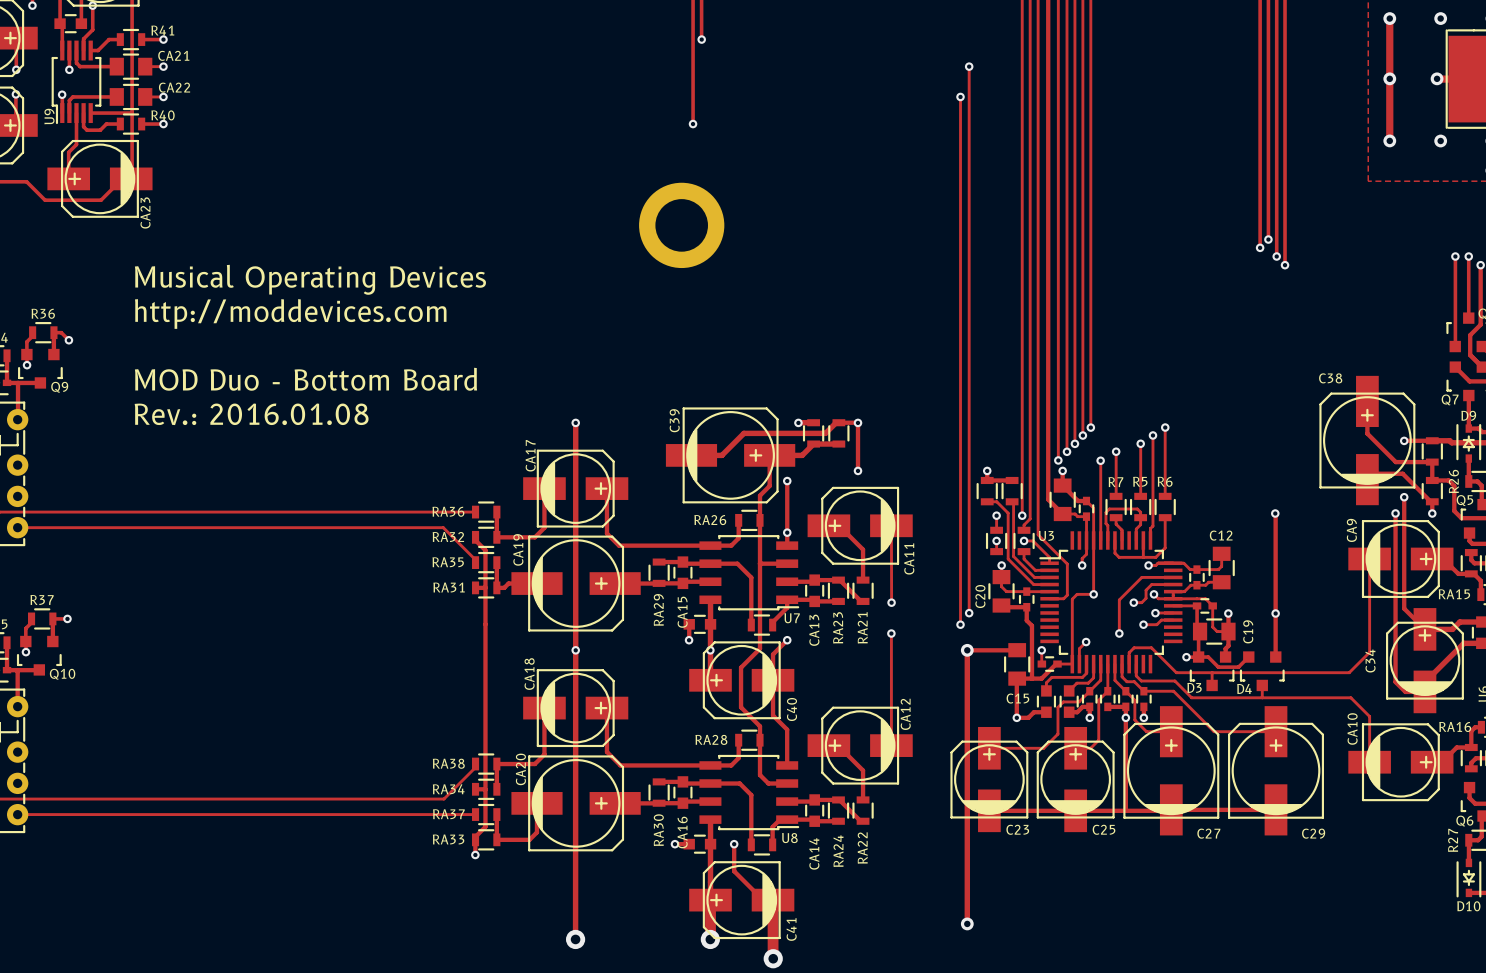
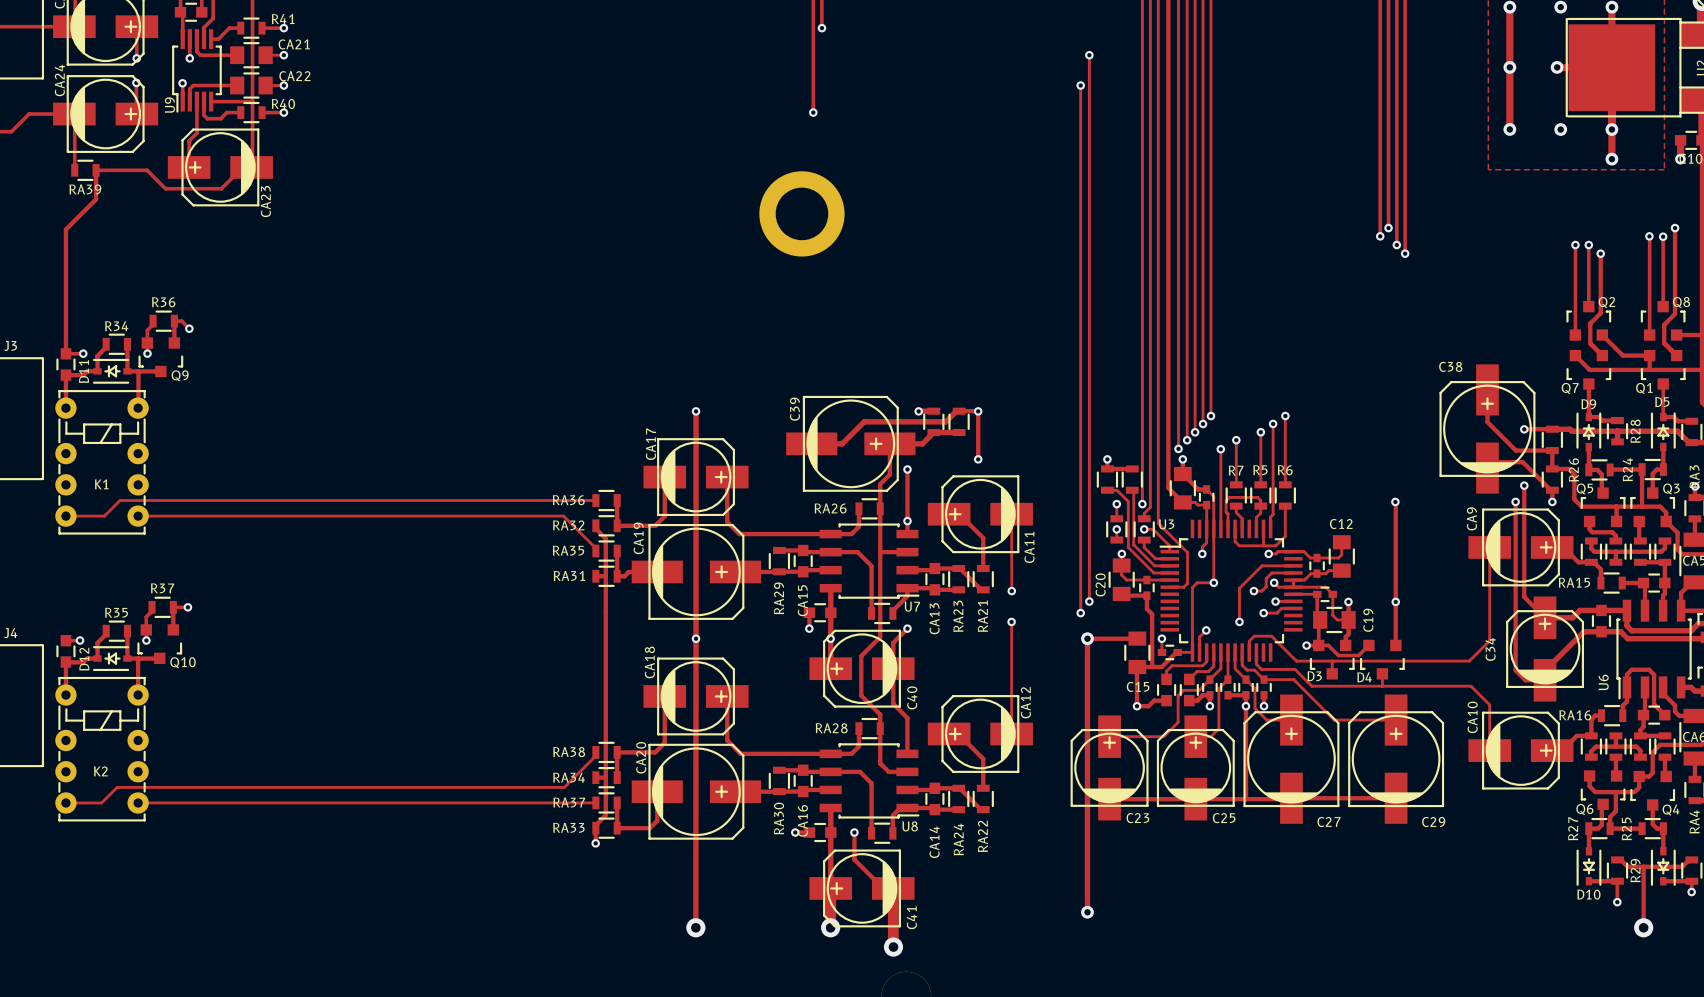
text: Musical Operating Devices (310, 279) -> none
text: http://moddevices.com (290, 314) -> none
text: MOD Duo - Bottom Board (305, 379) -> none
text: Rev.: 2016.01.08 (251, 414) -> none

